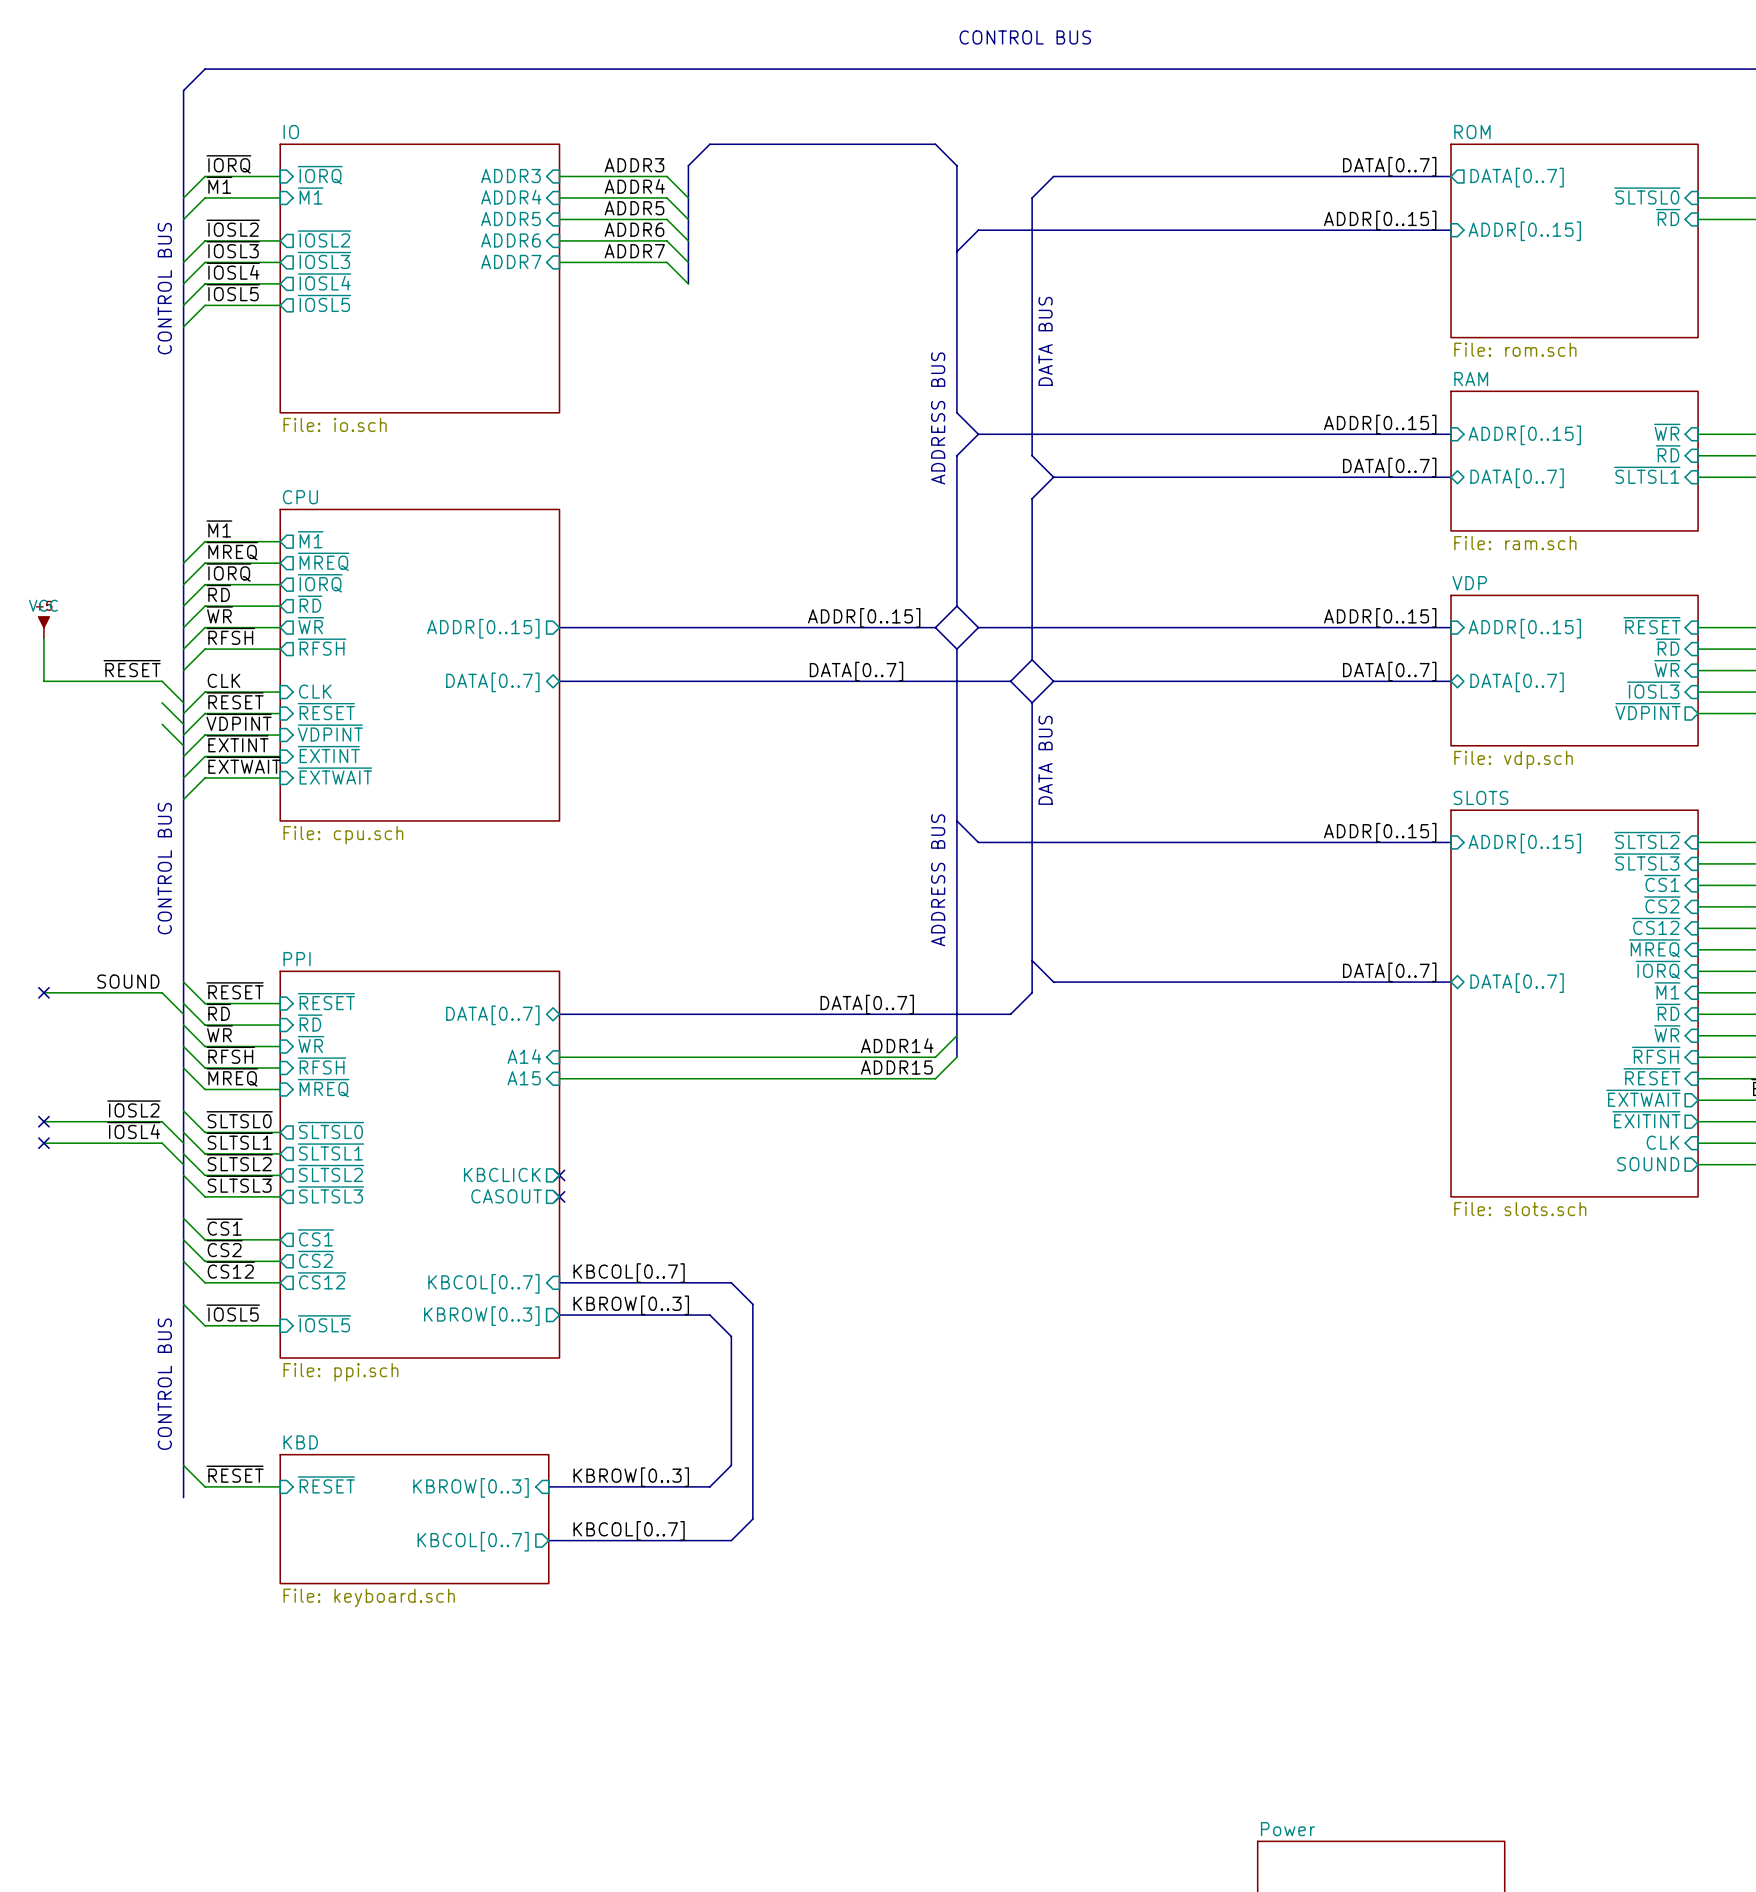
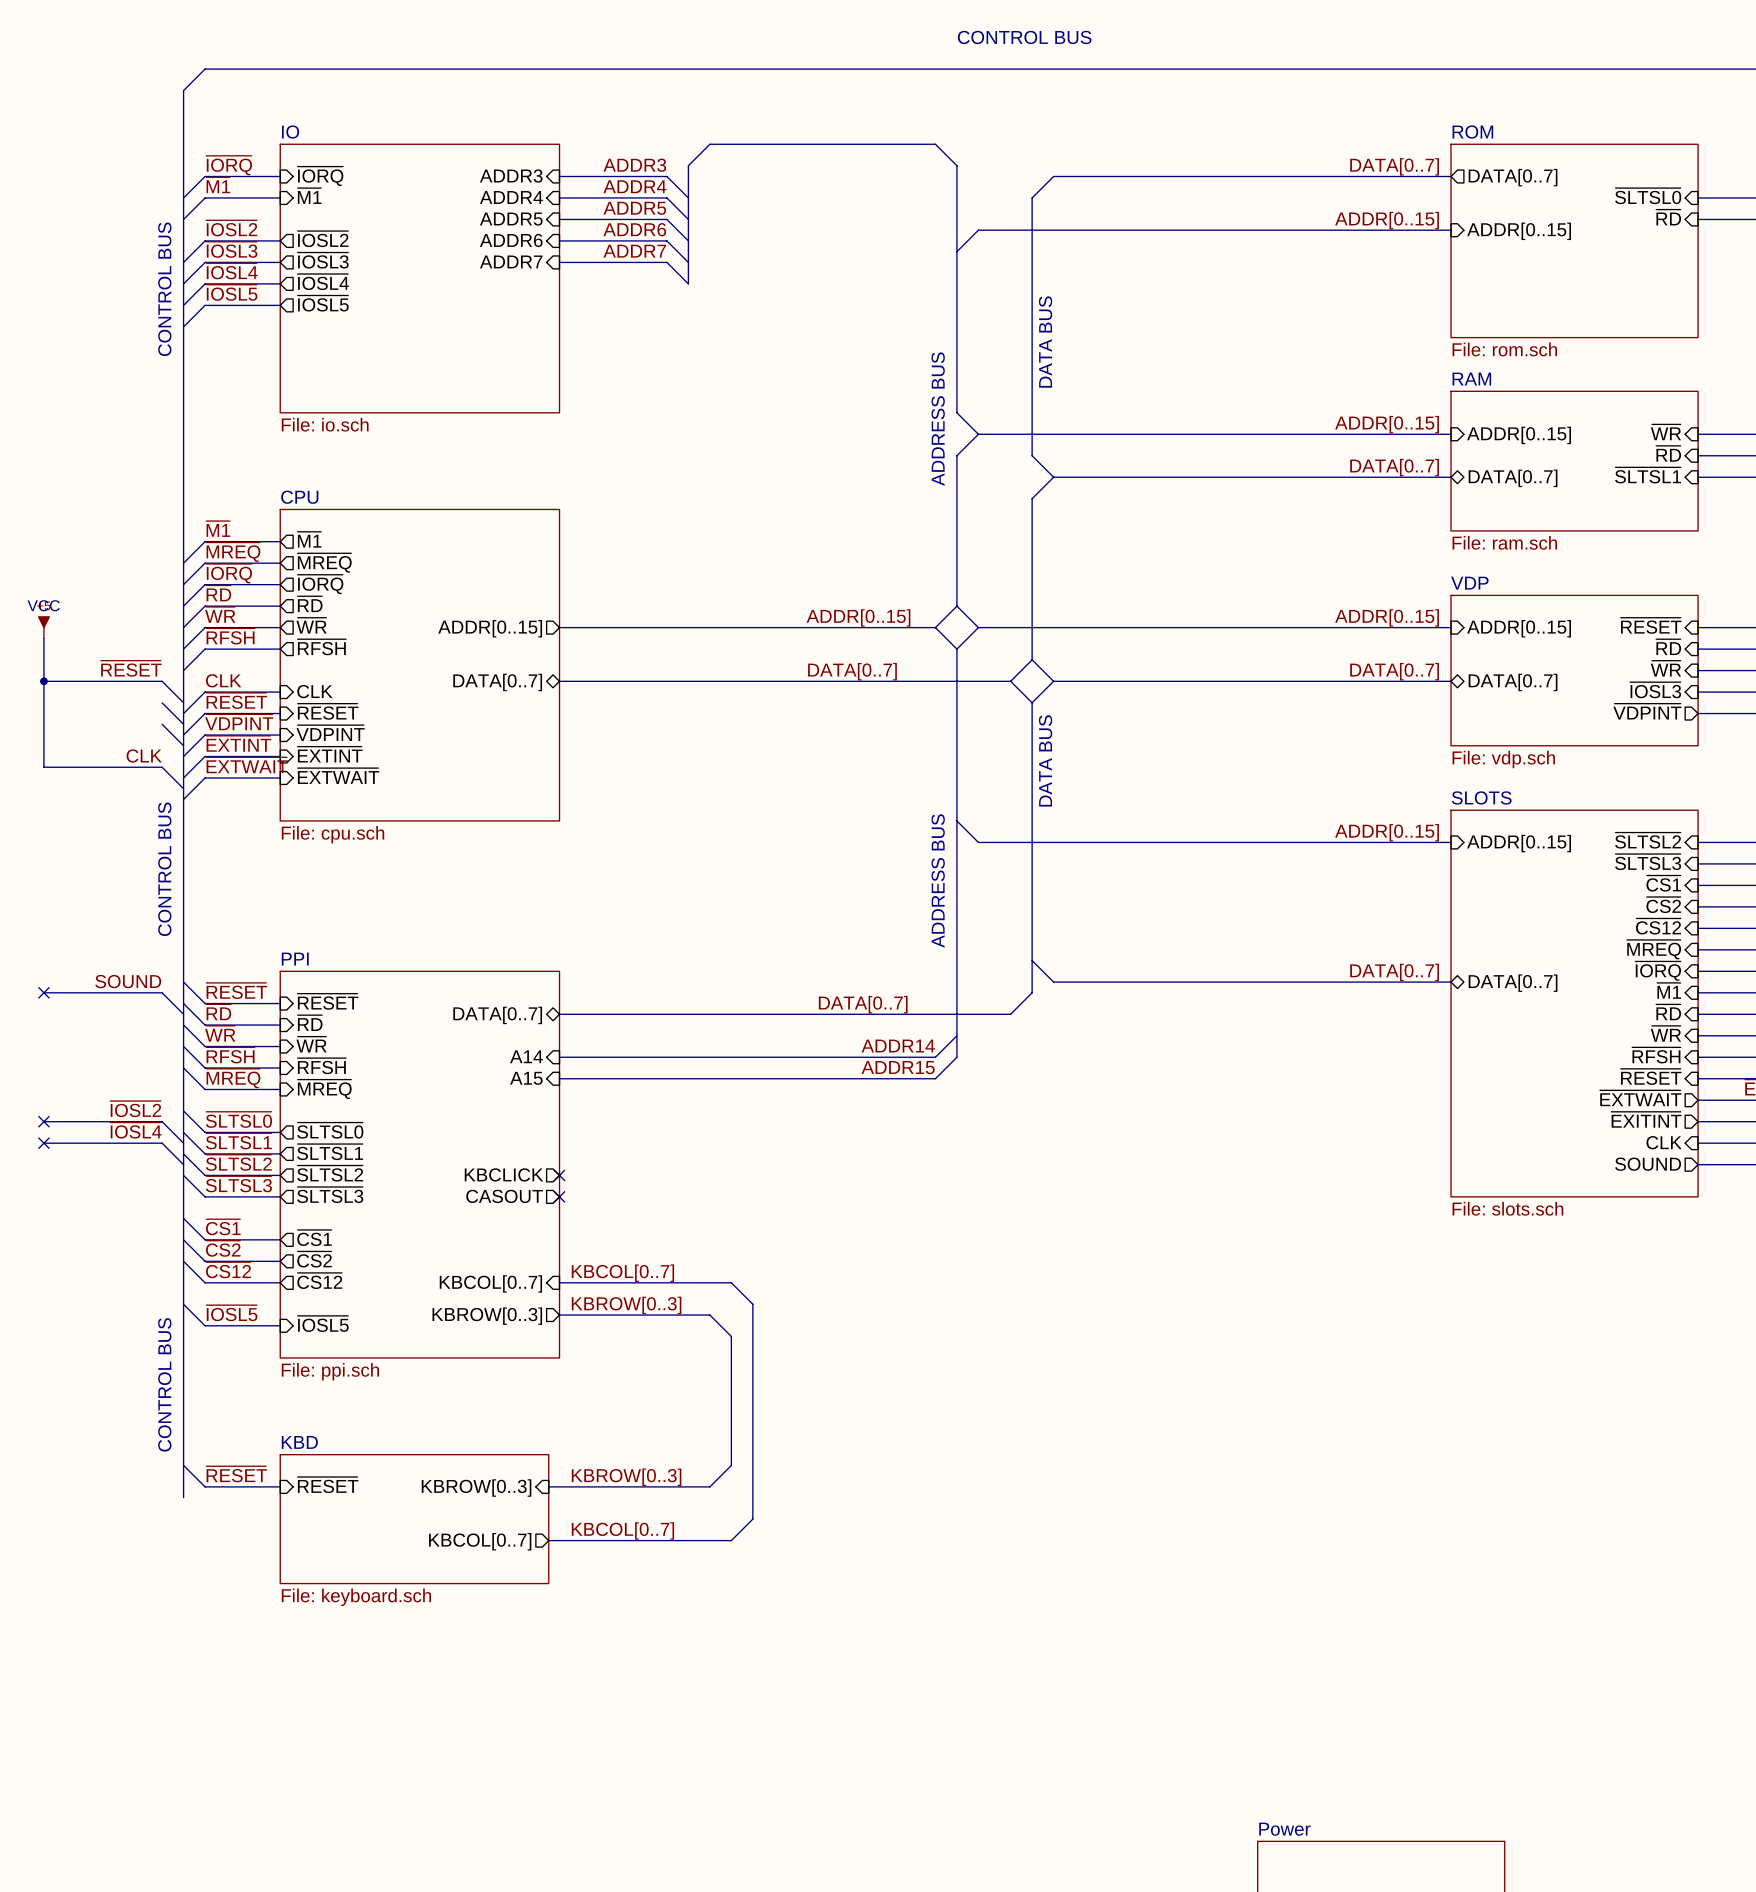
wire: none -> (43, 681) (43, 767) (162, 767) (183, 788)
junction: none -> (43, 681)
label: none -> CLK (144, 756)

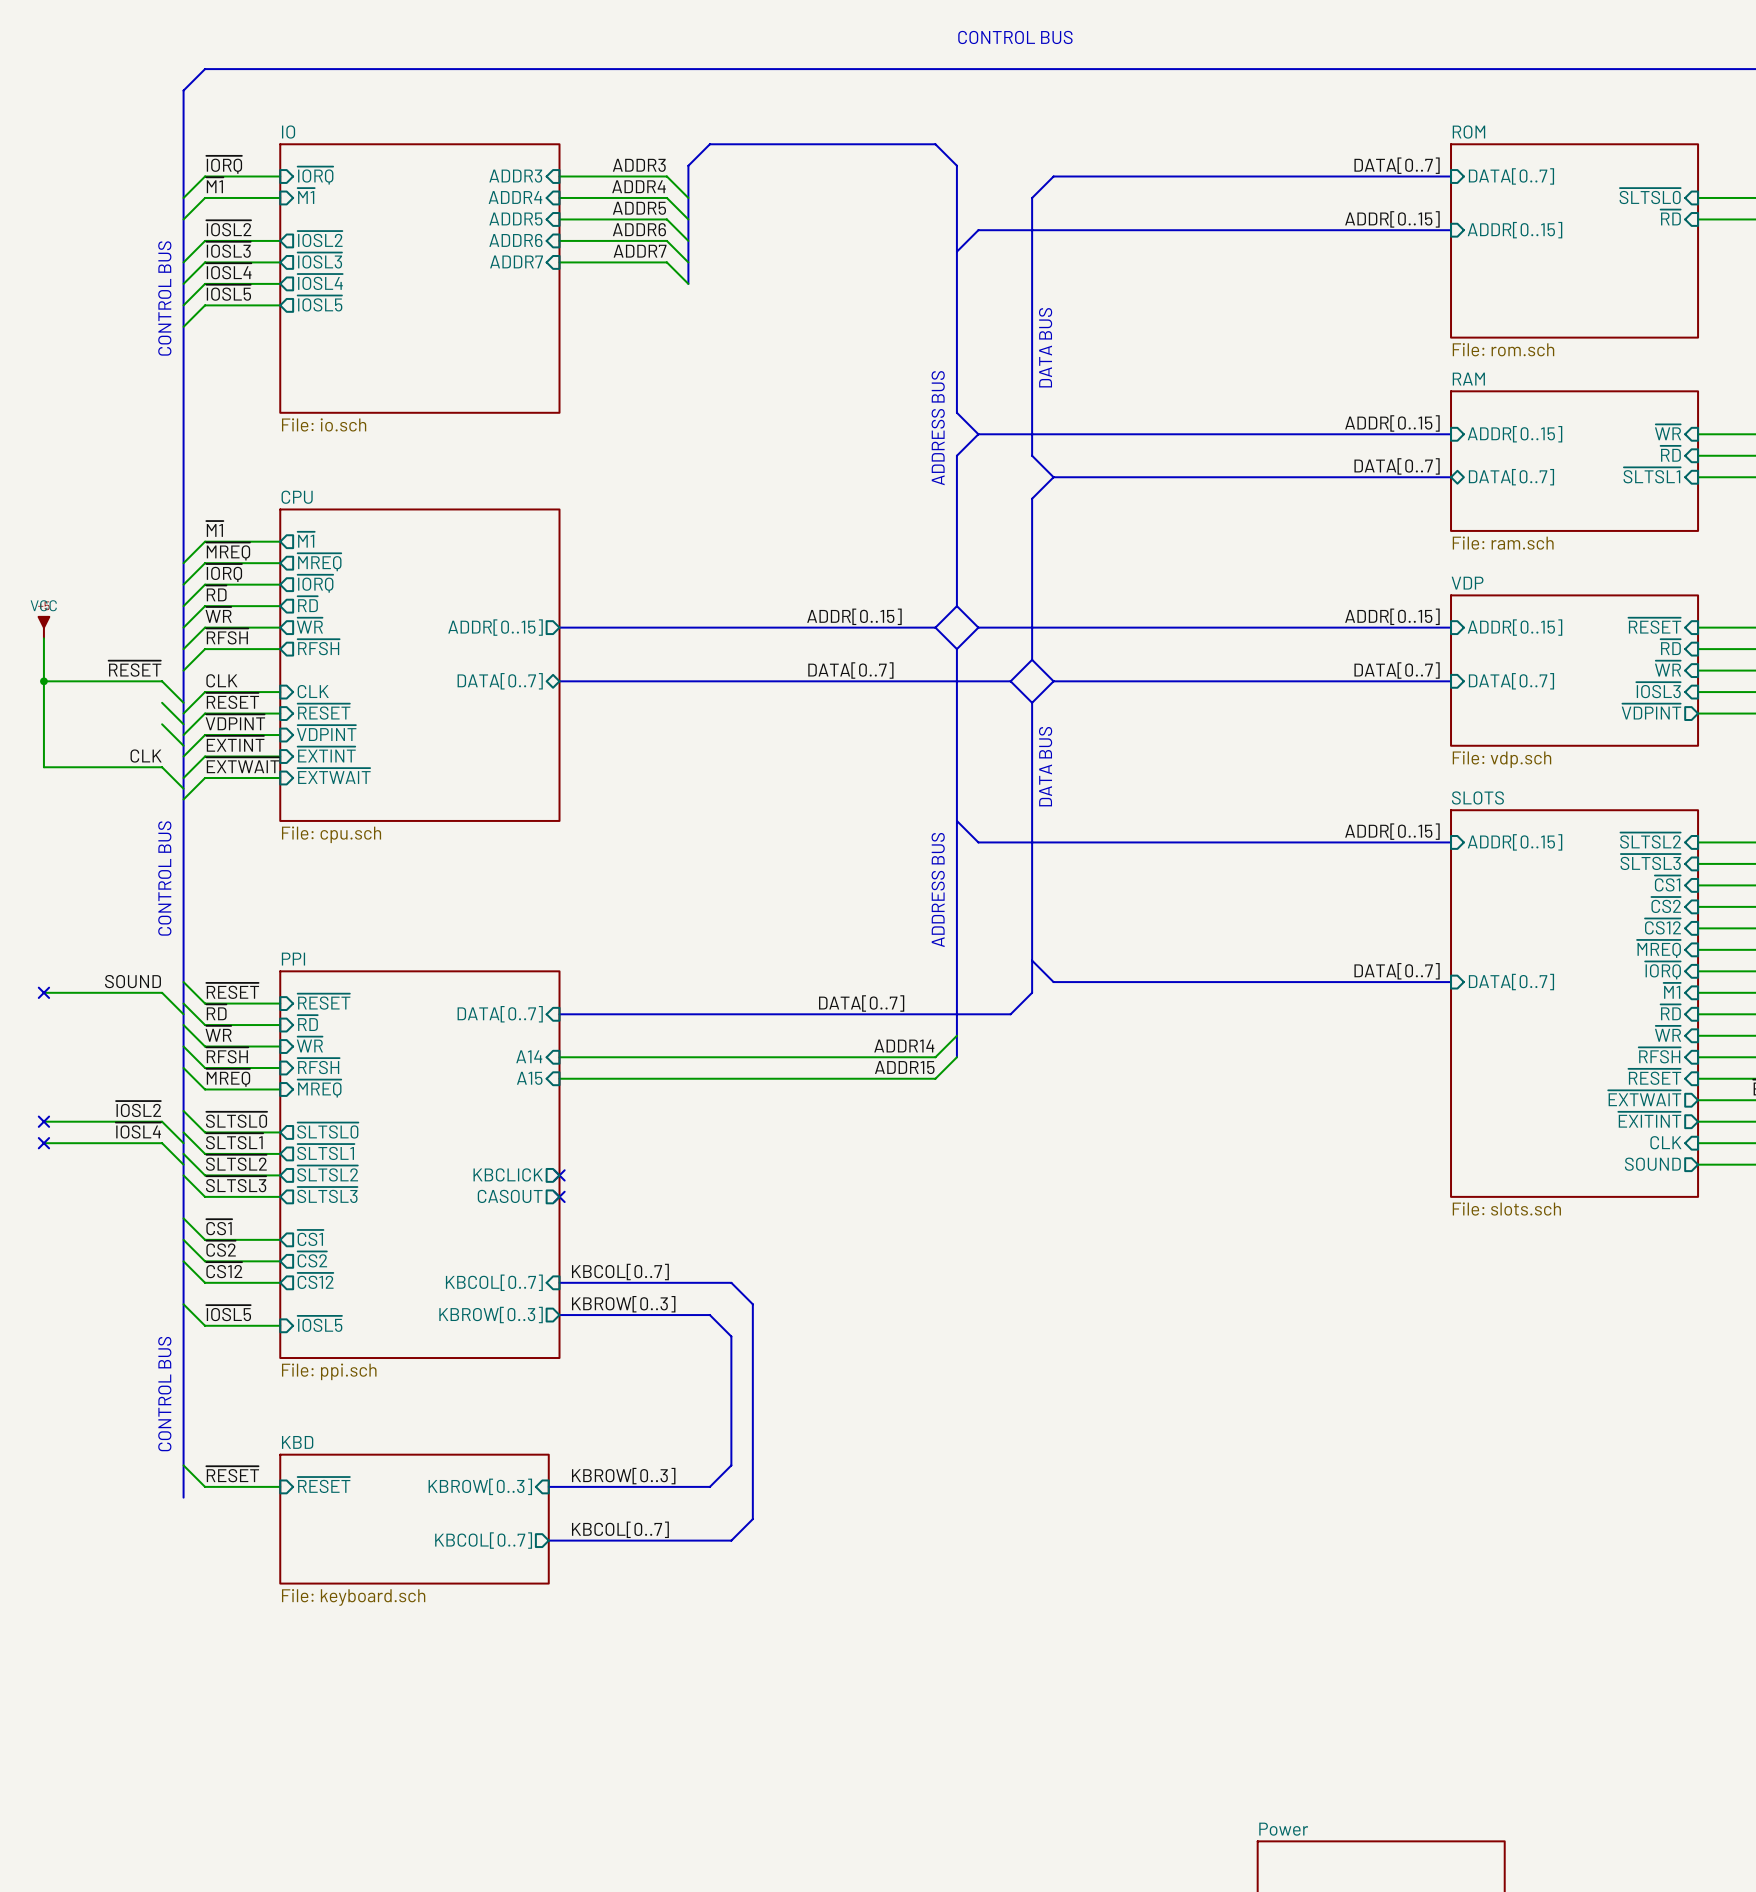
sheet pin shape: output (1513, 177) -> input (1511, 176)
sheet pin shape: bidirectional (1513, 682) -> input (1511, 681)
sheet pin shape: bidirectional (1513, 983) -> input (1511, 982)
sheet pin shape: bidirectional (497, 1015) -> input (500, 1014)

